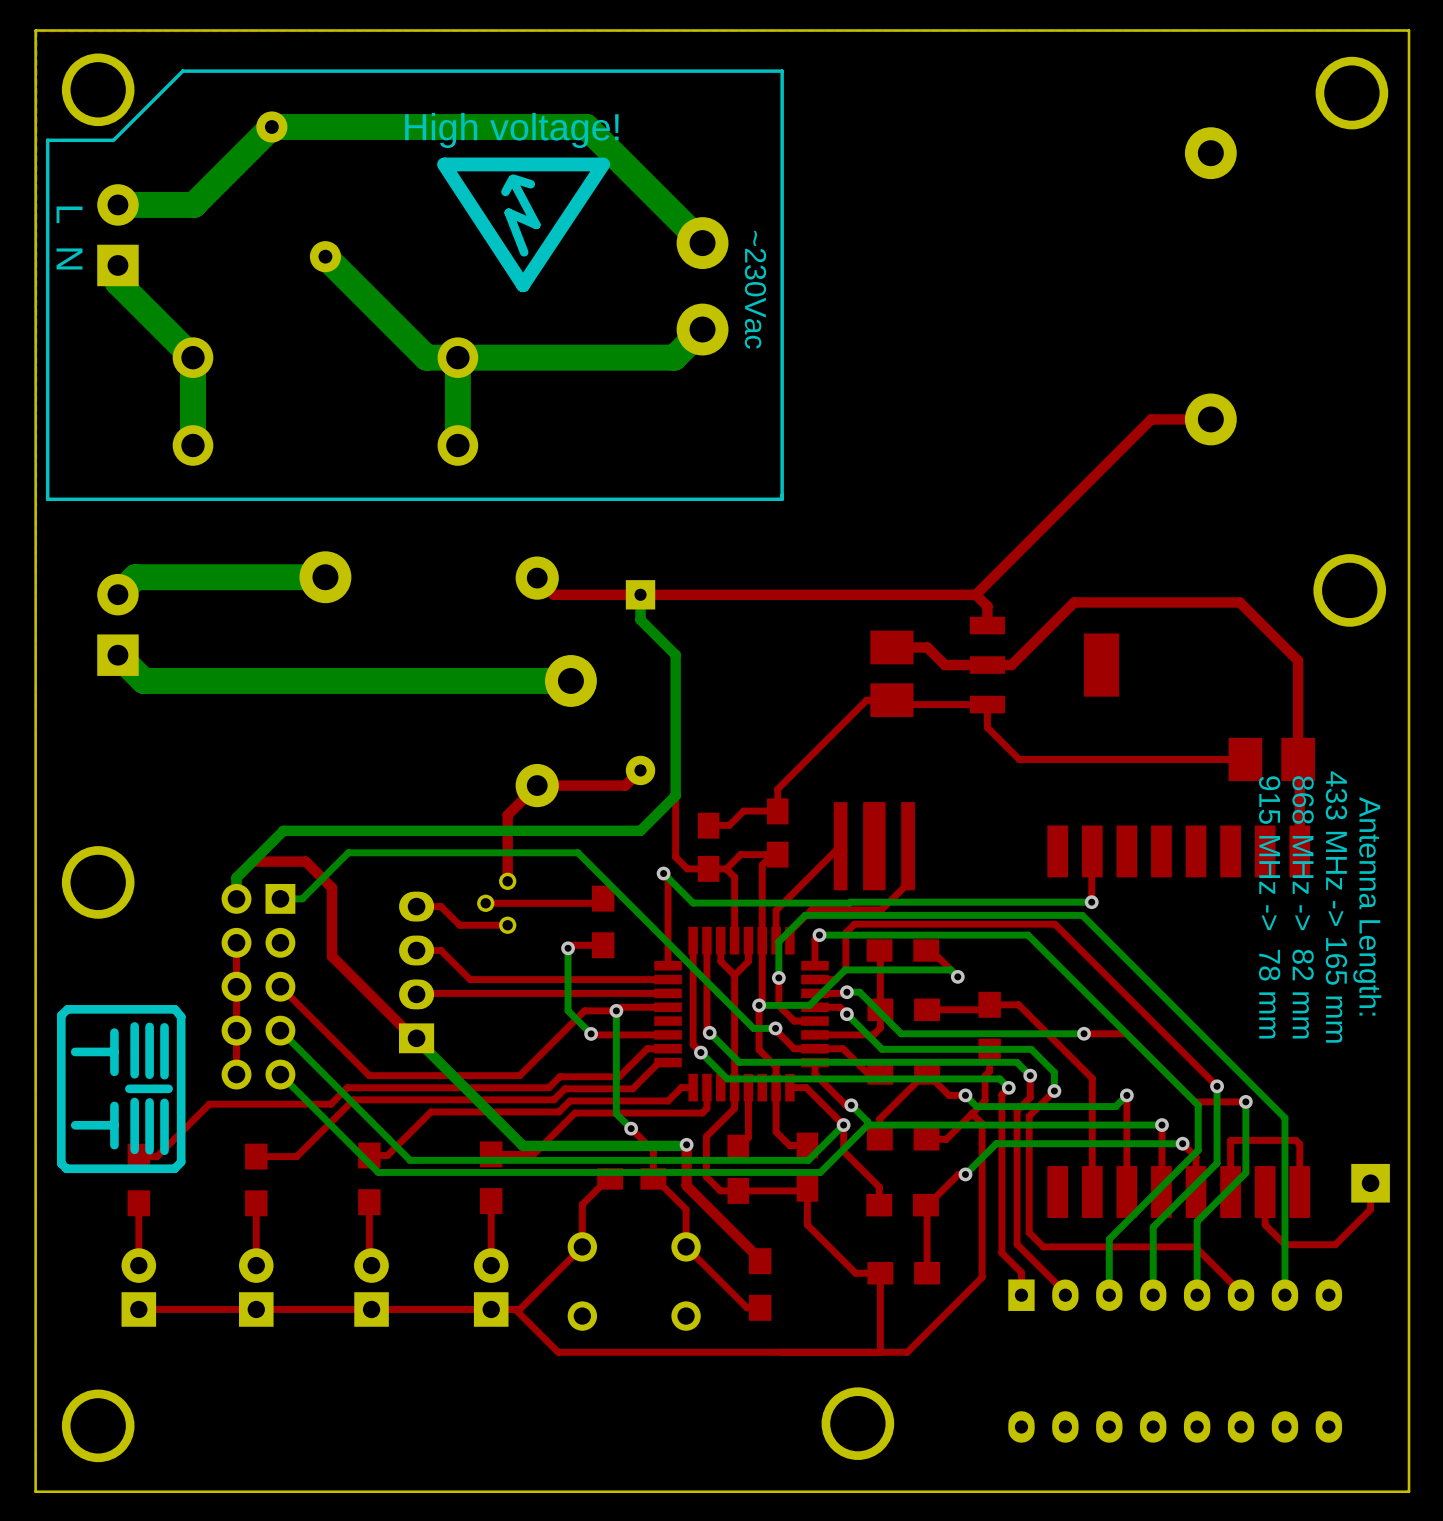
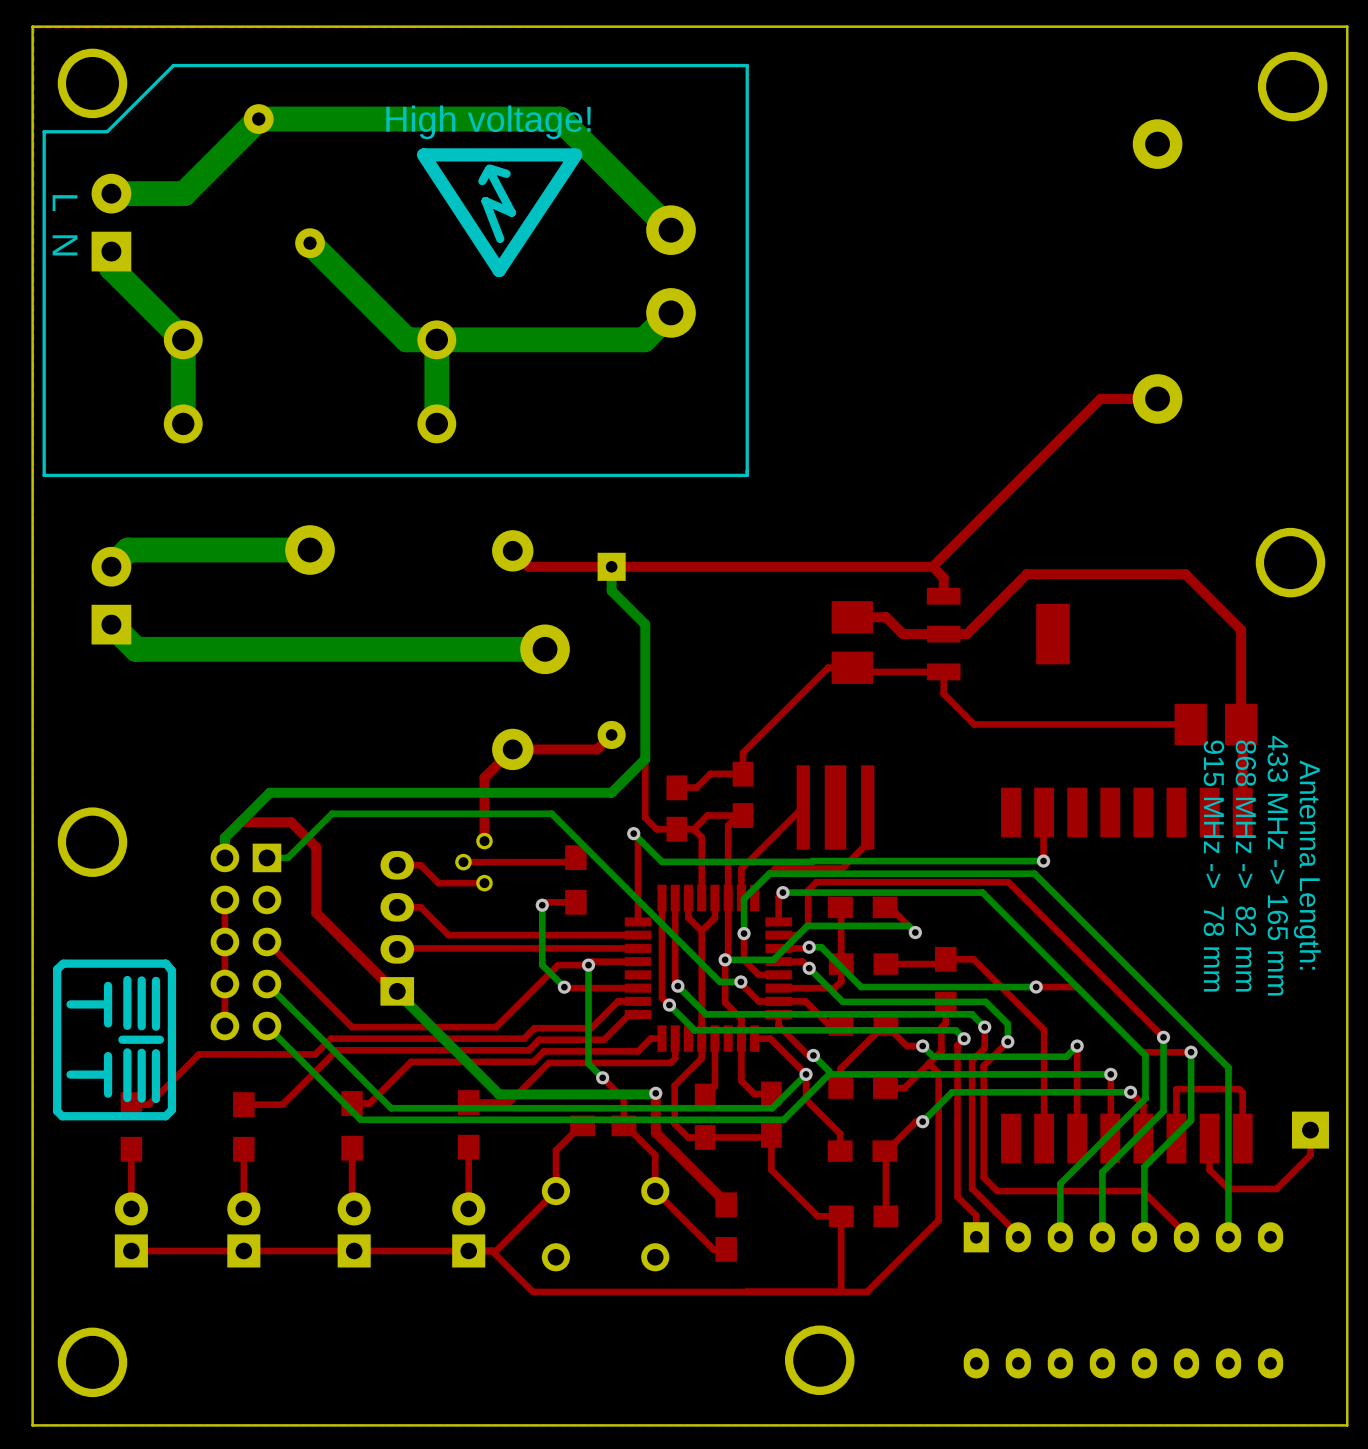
text: ~230Vac (755, 289) -> none

